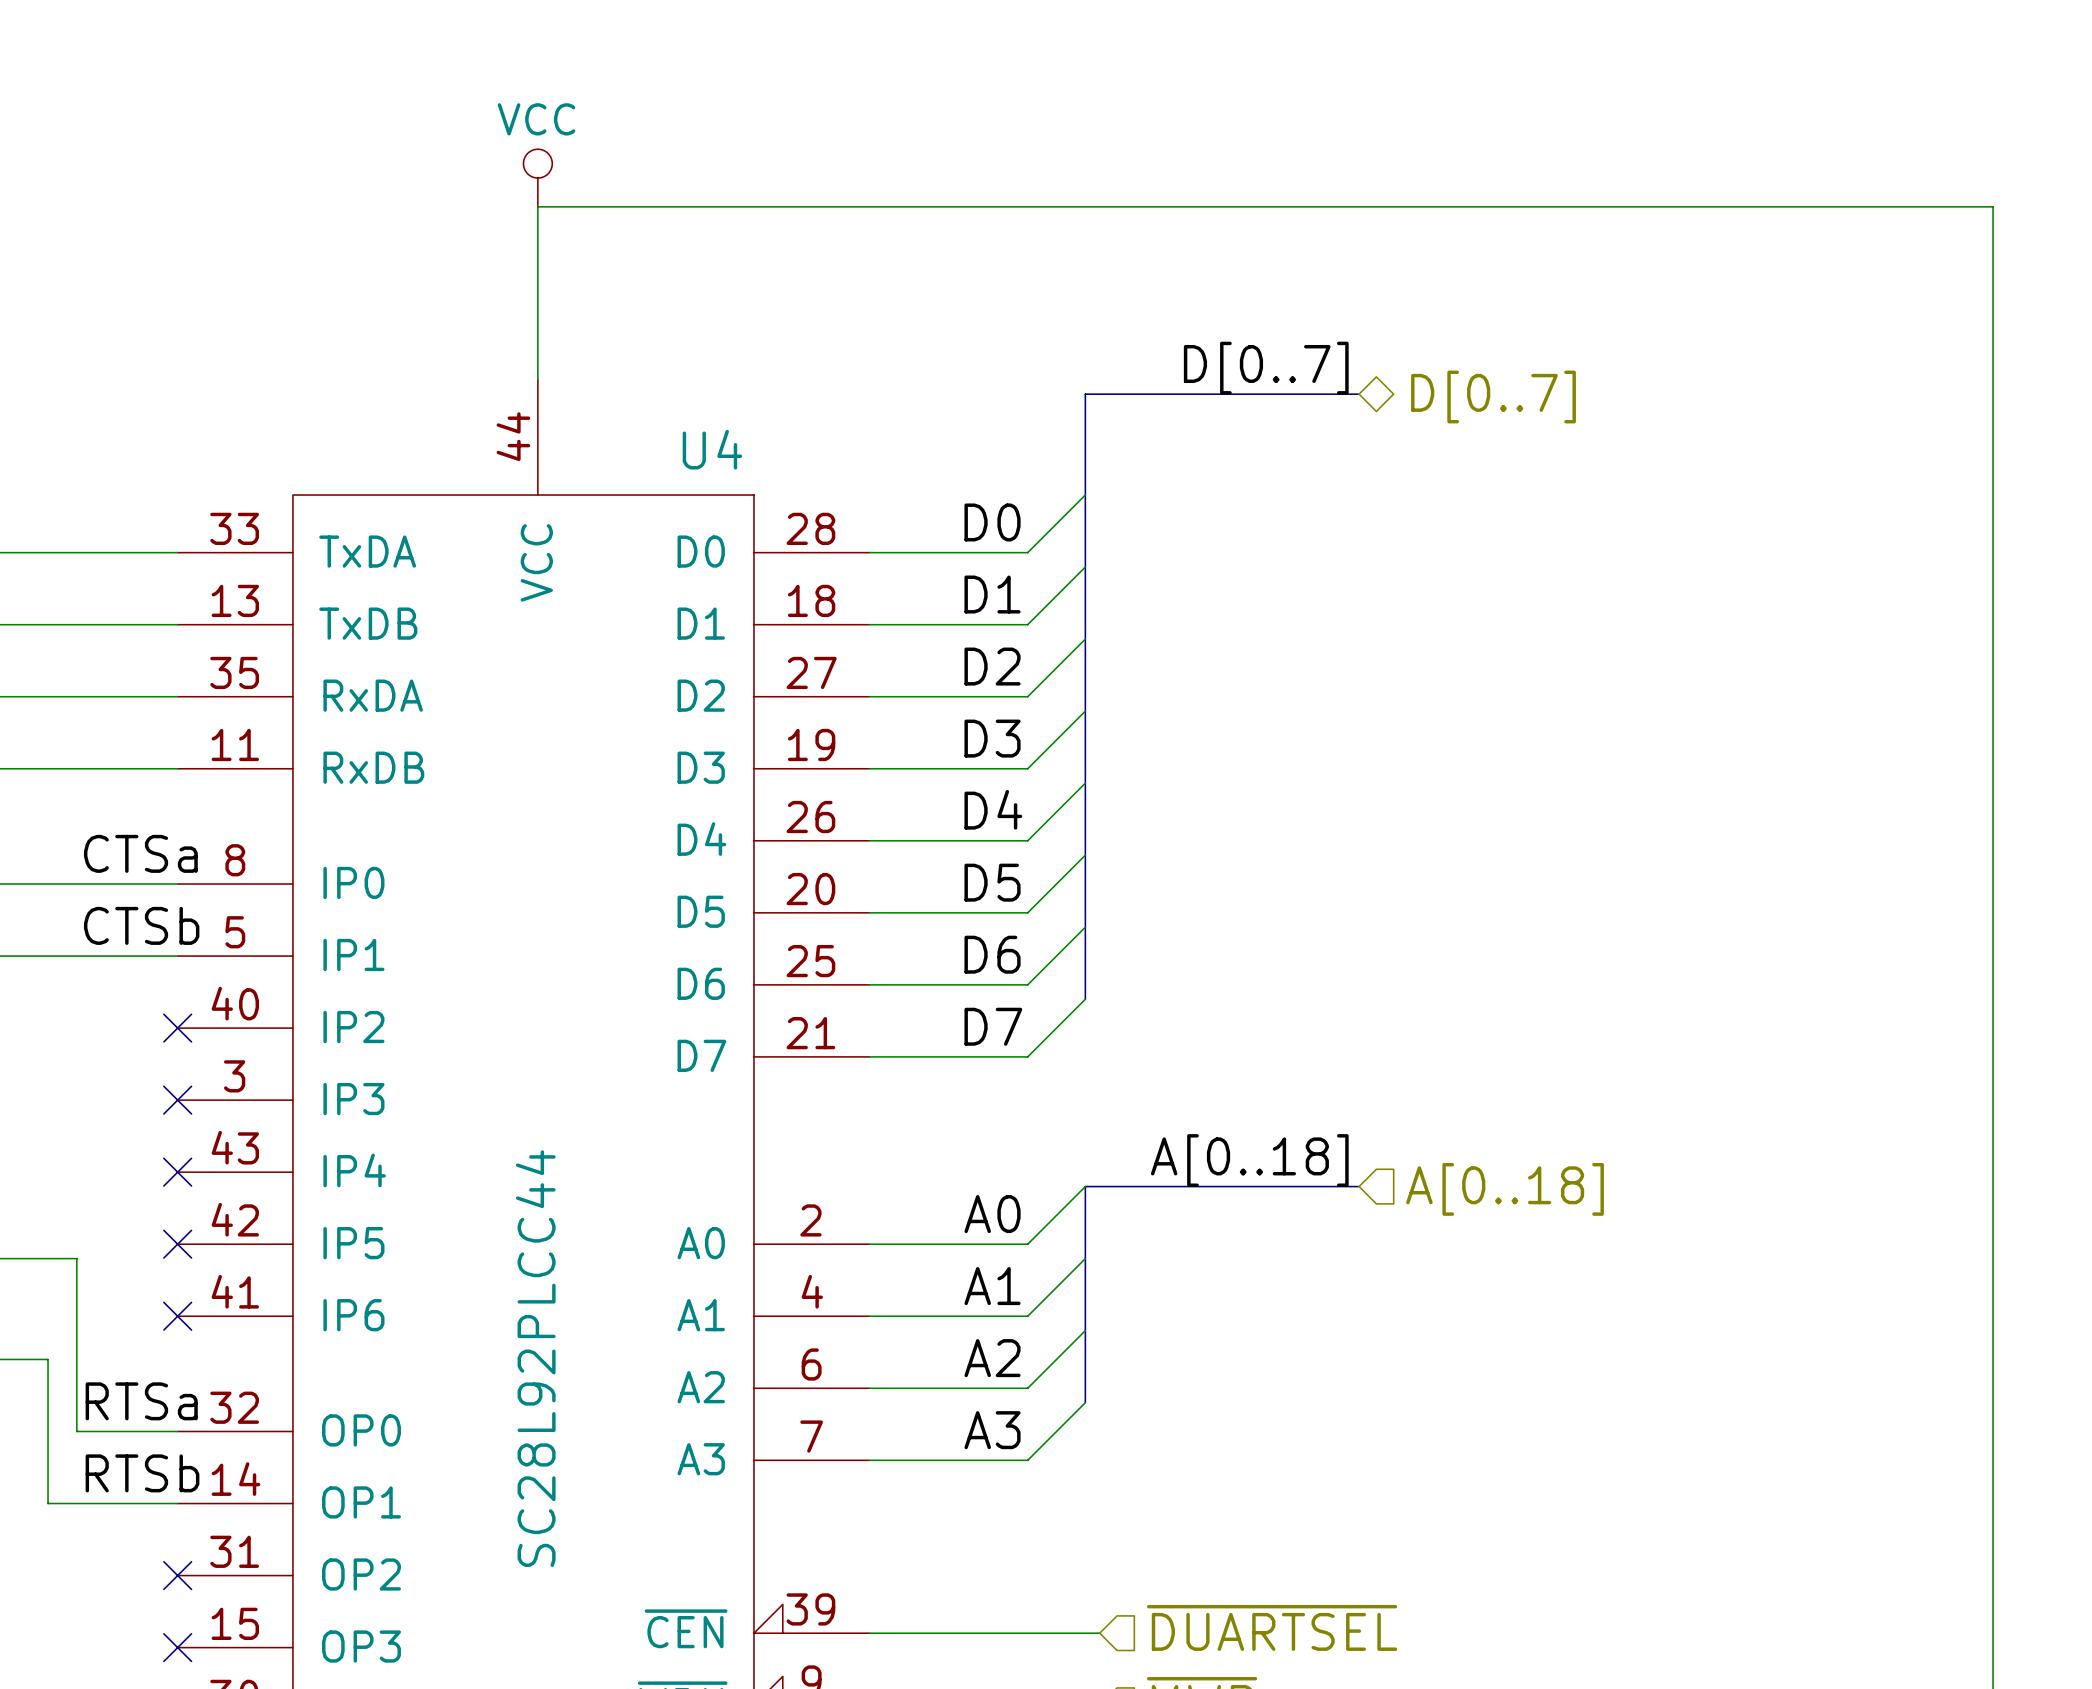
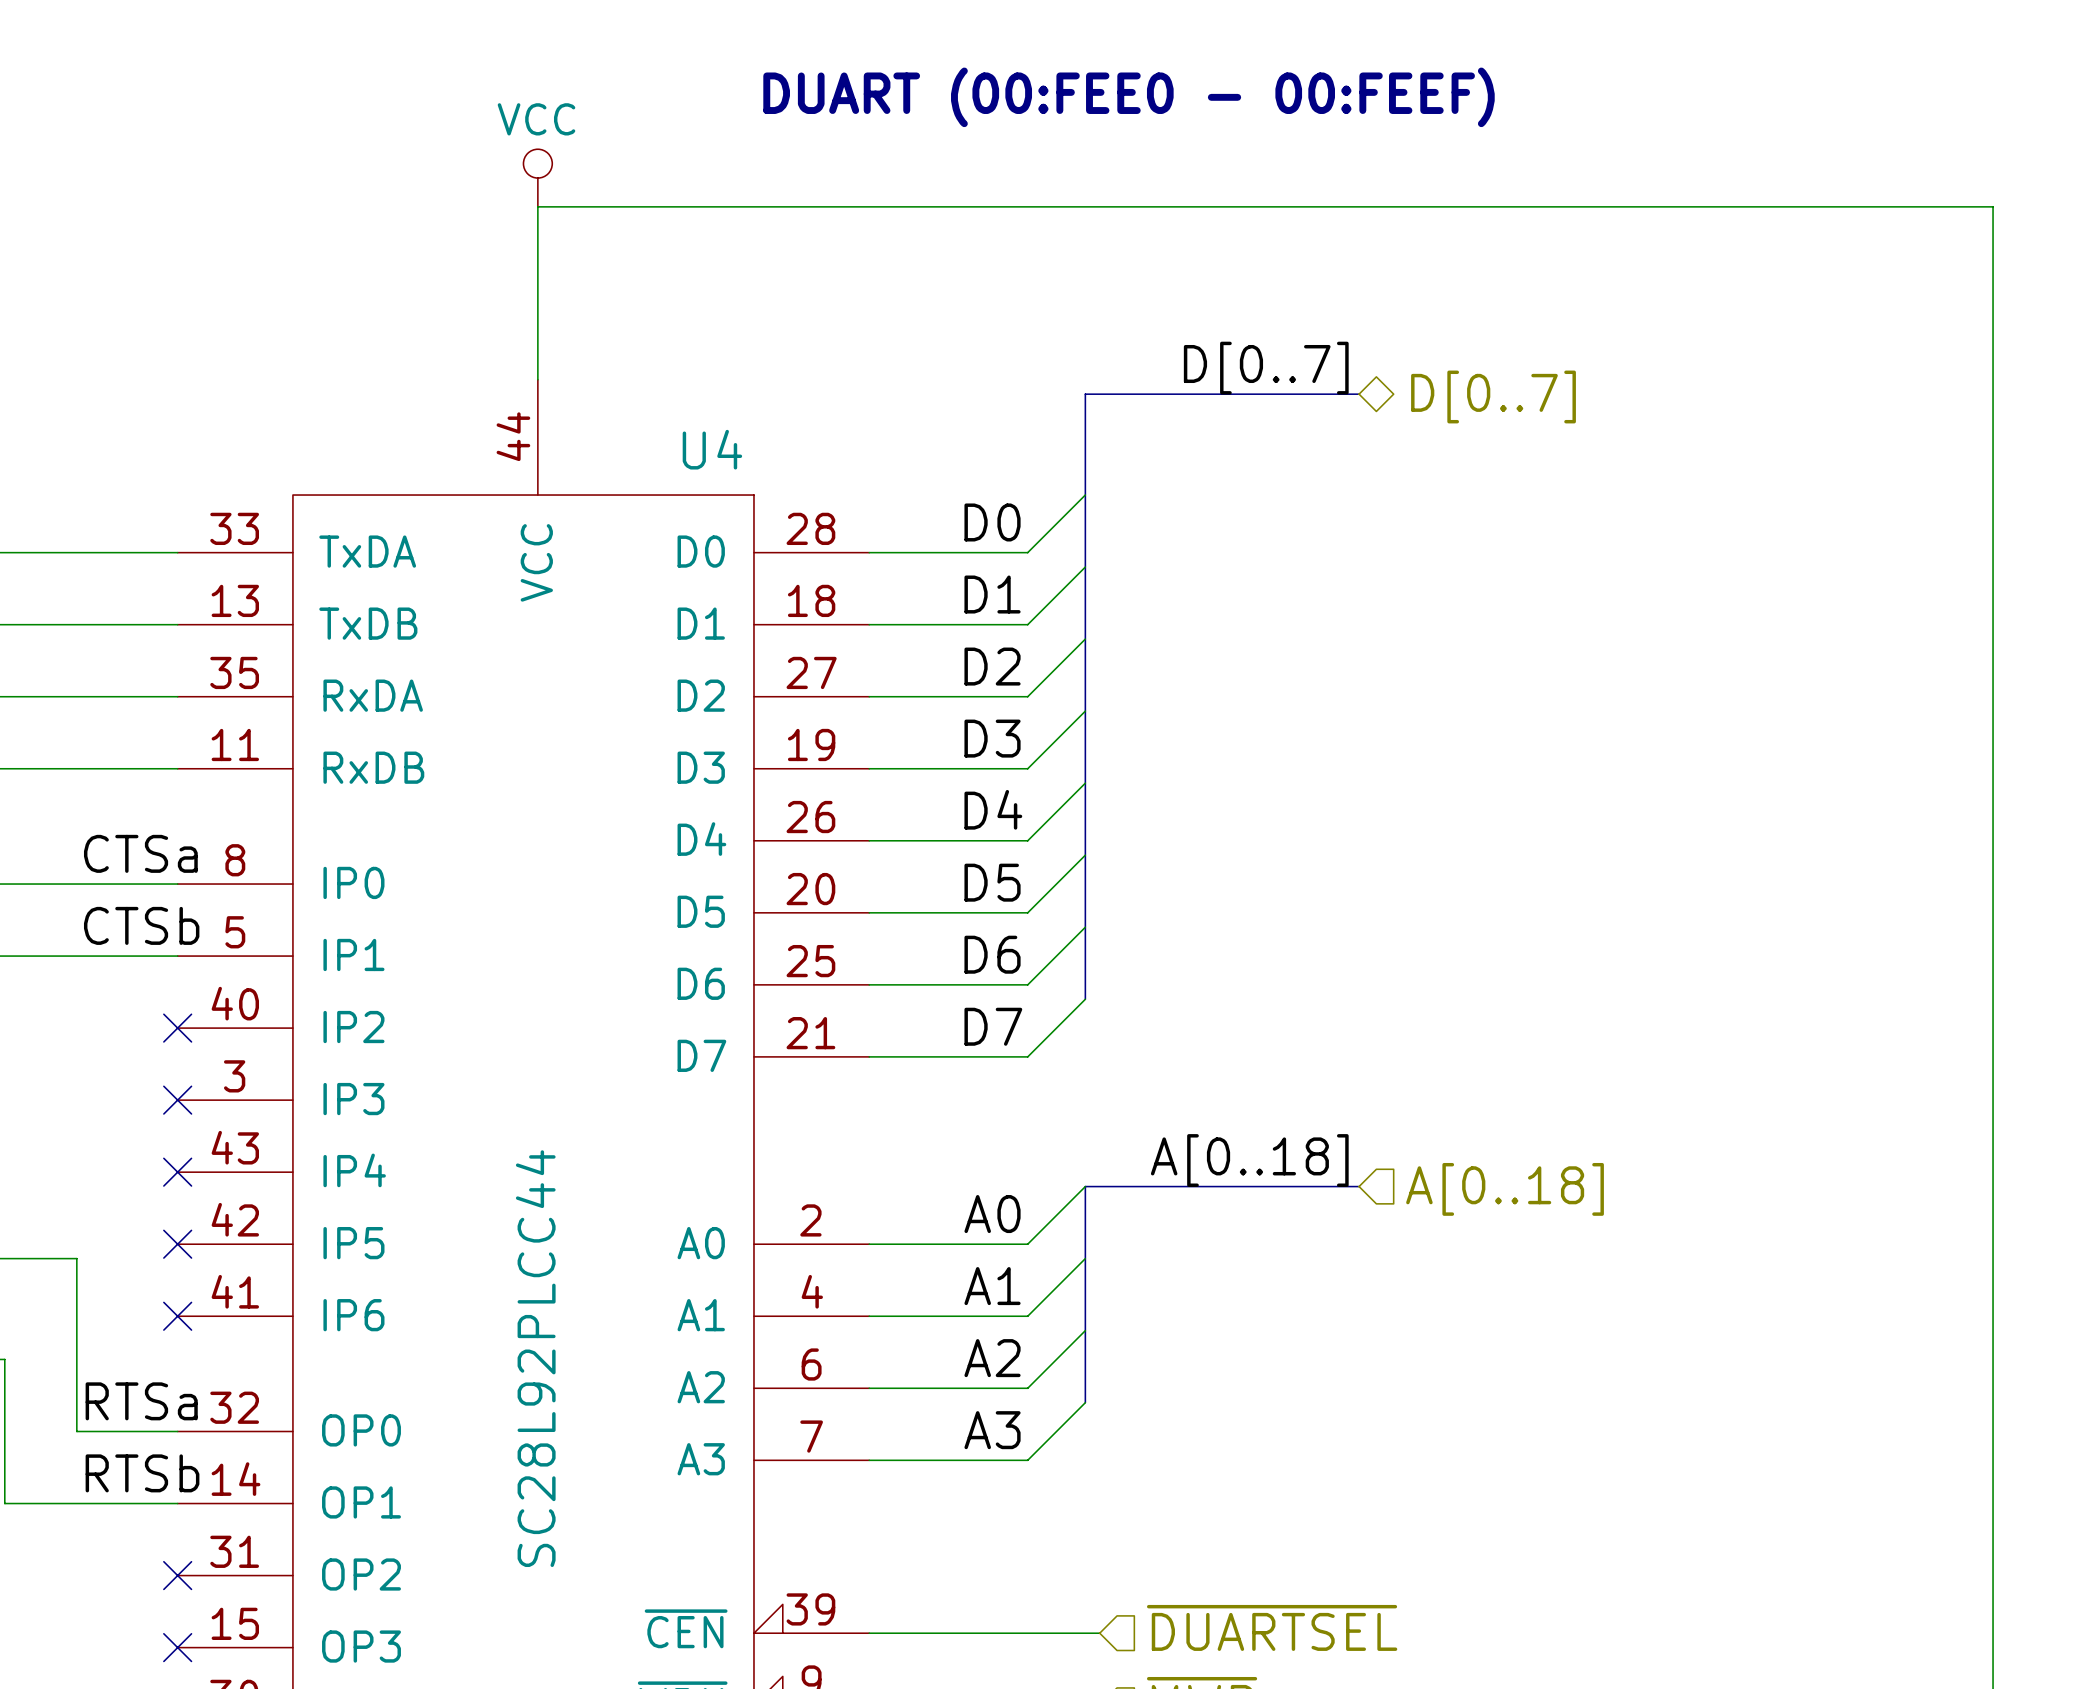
text: none -> DUART (00:FEE0 - 00:FEEF) (1129, 97)
wire: (4, 1359) (48, 1359) (48, 1503) -> (4, 1359) (4, 1503) (48, 1503)

